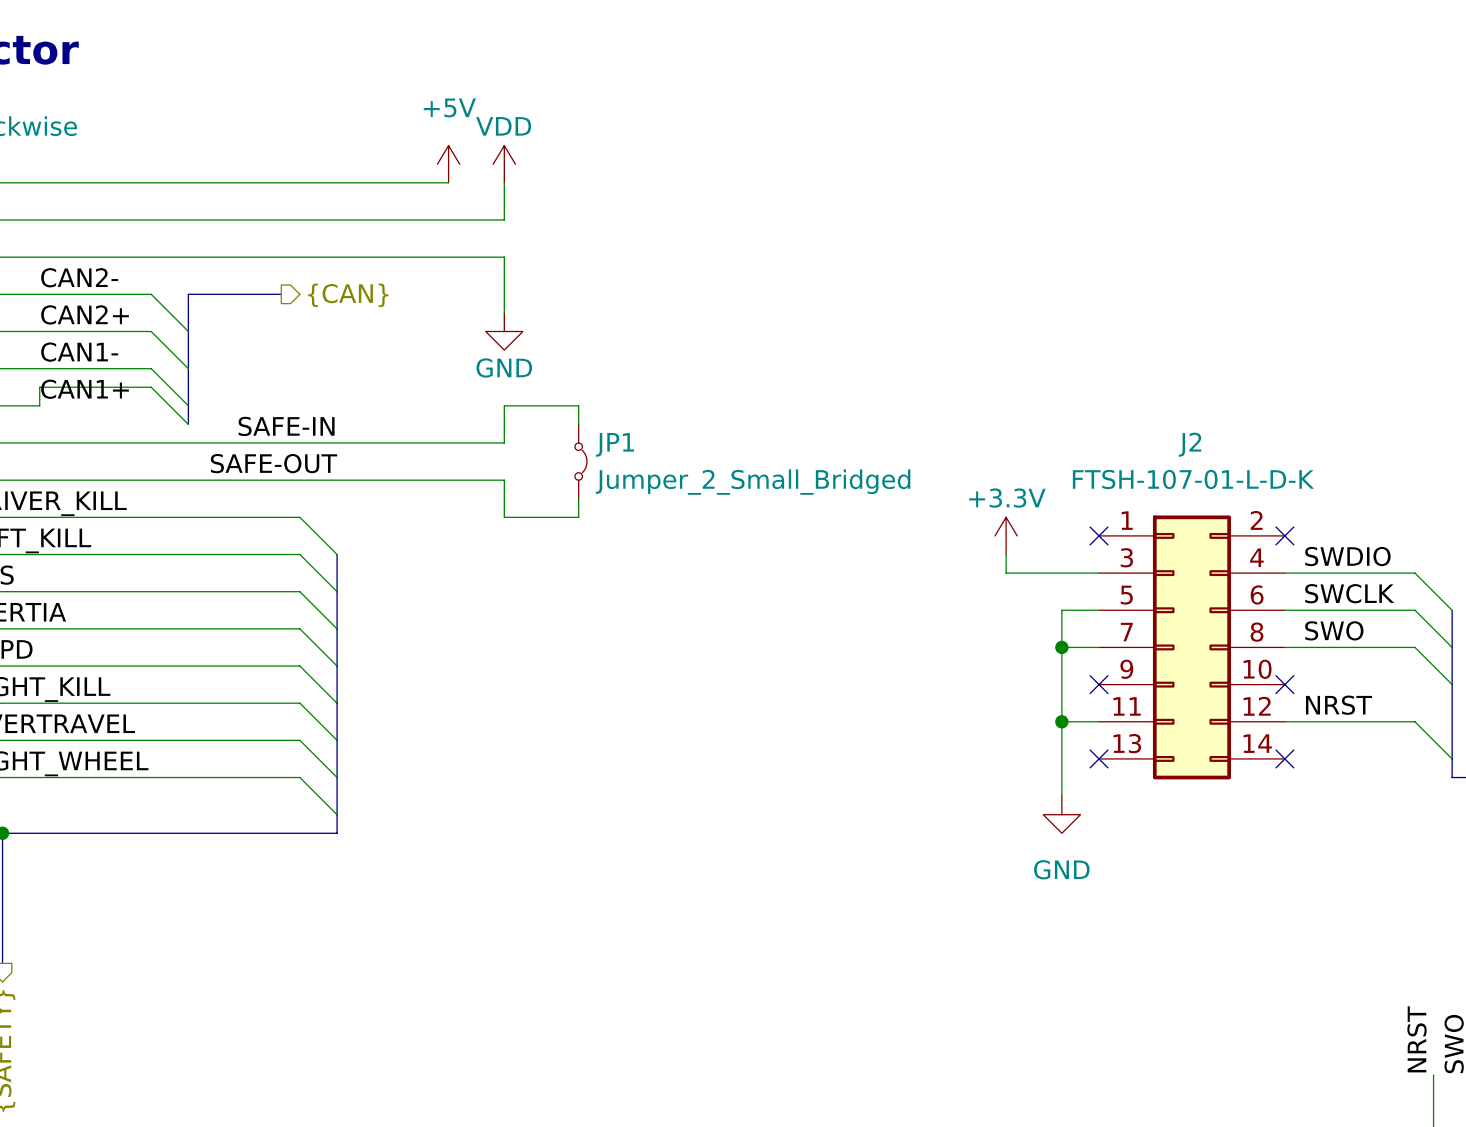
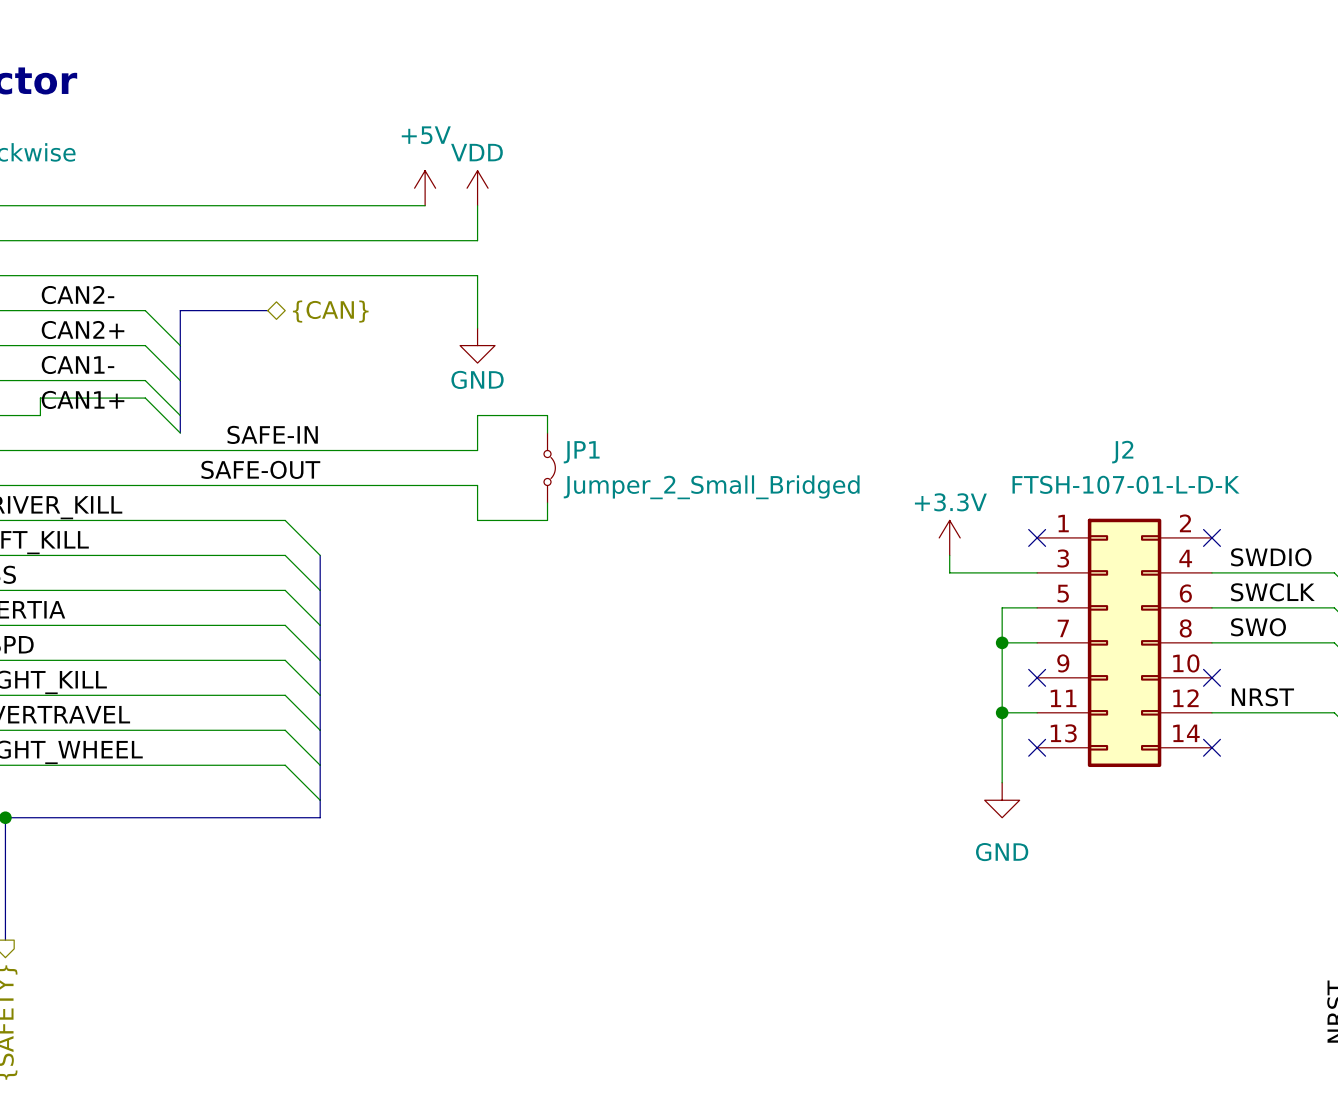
hierarchical label shape: output (348, 295) -> bidirectional (330, 311)

